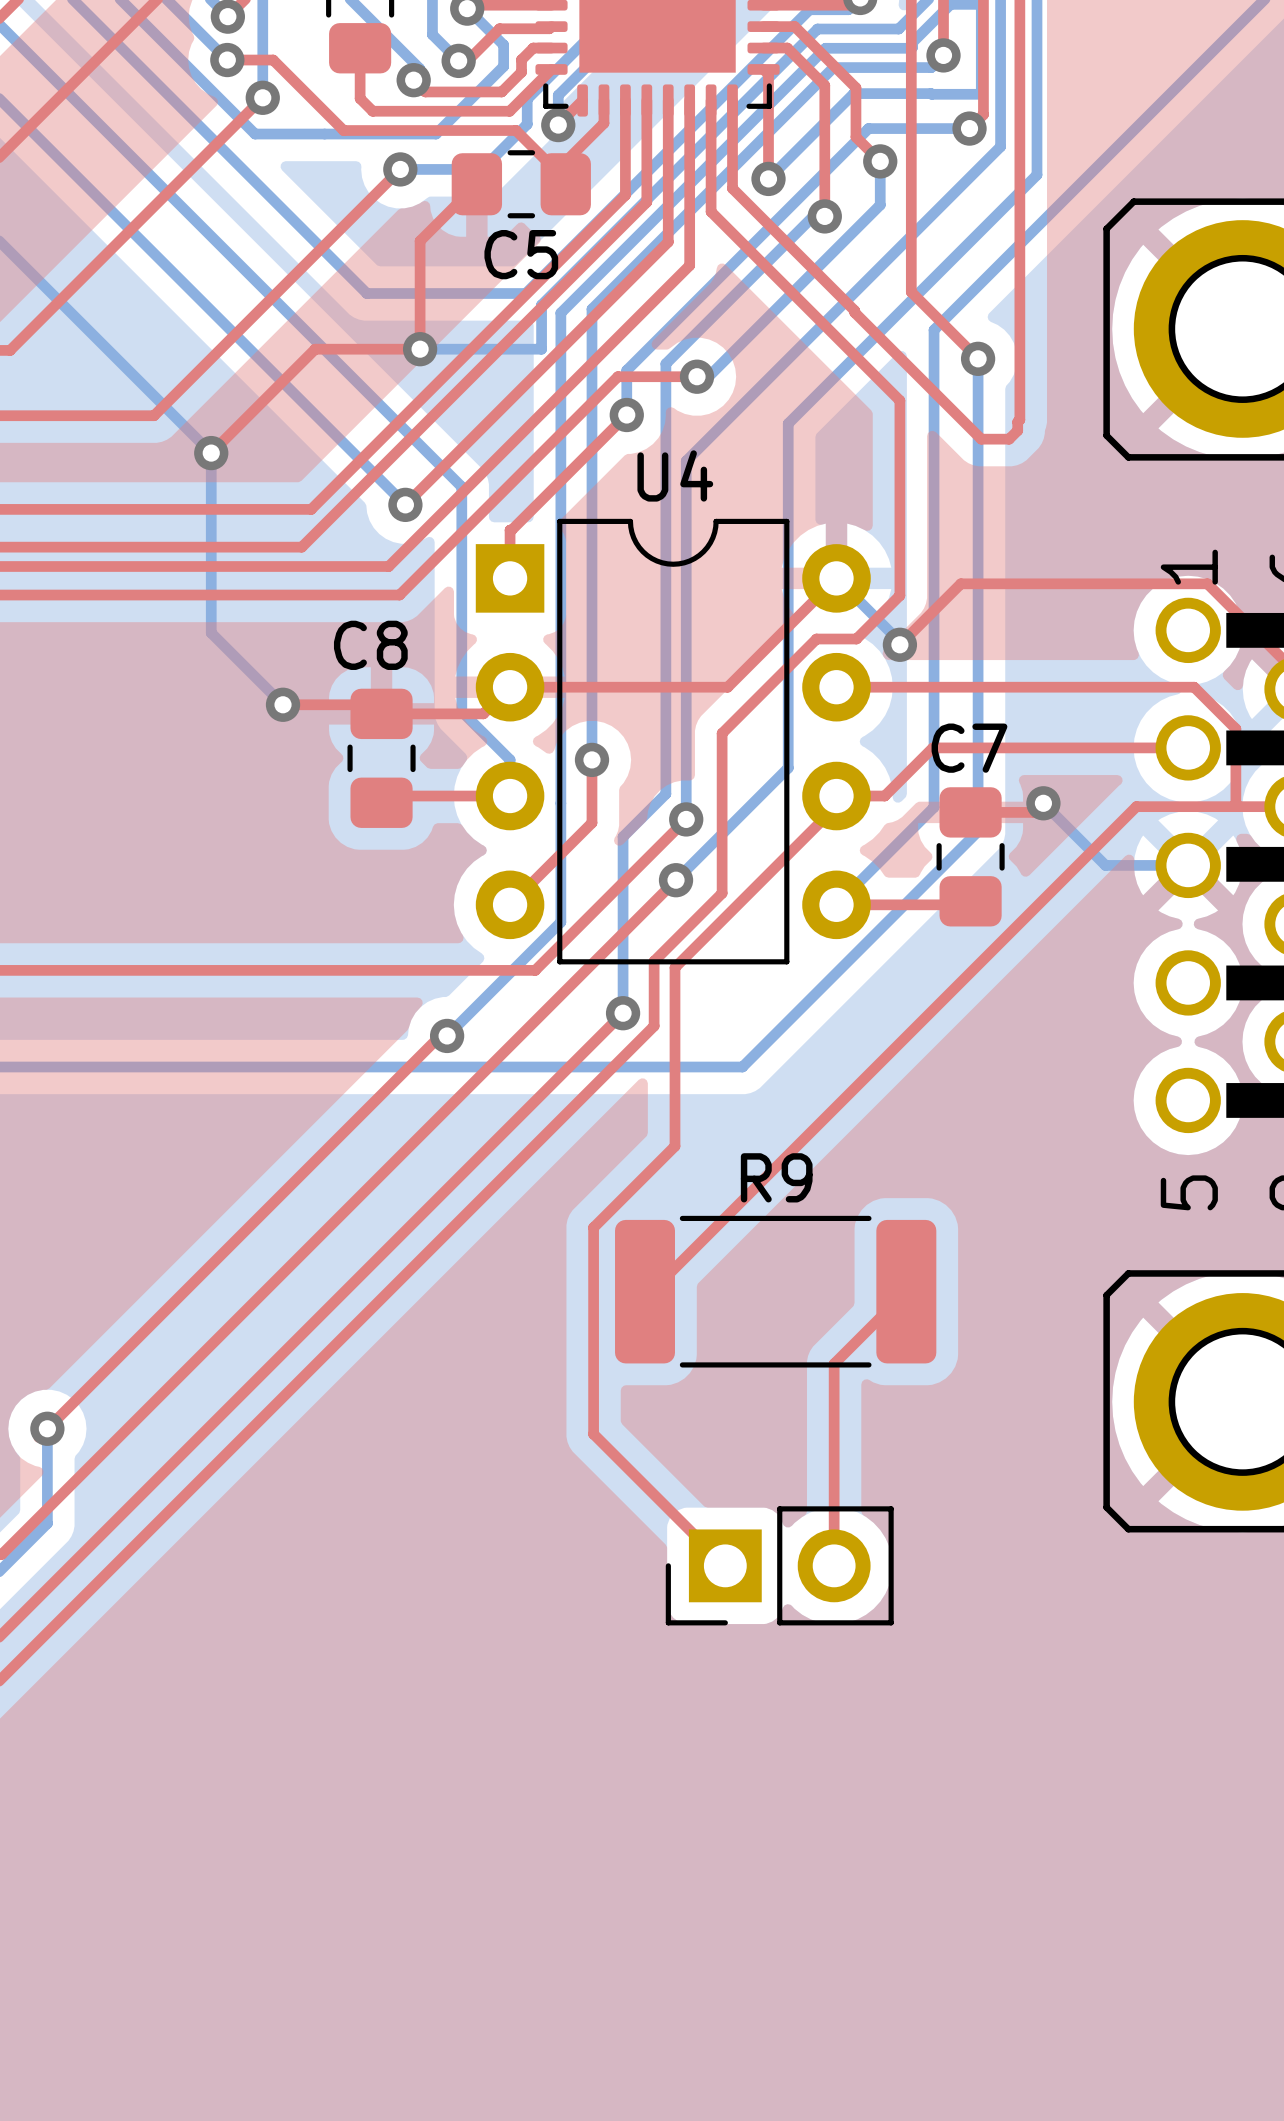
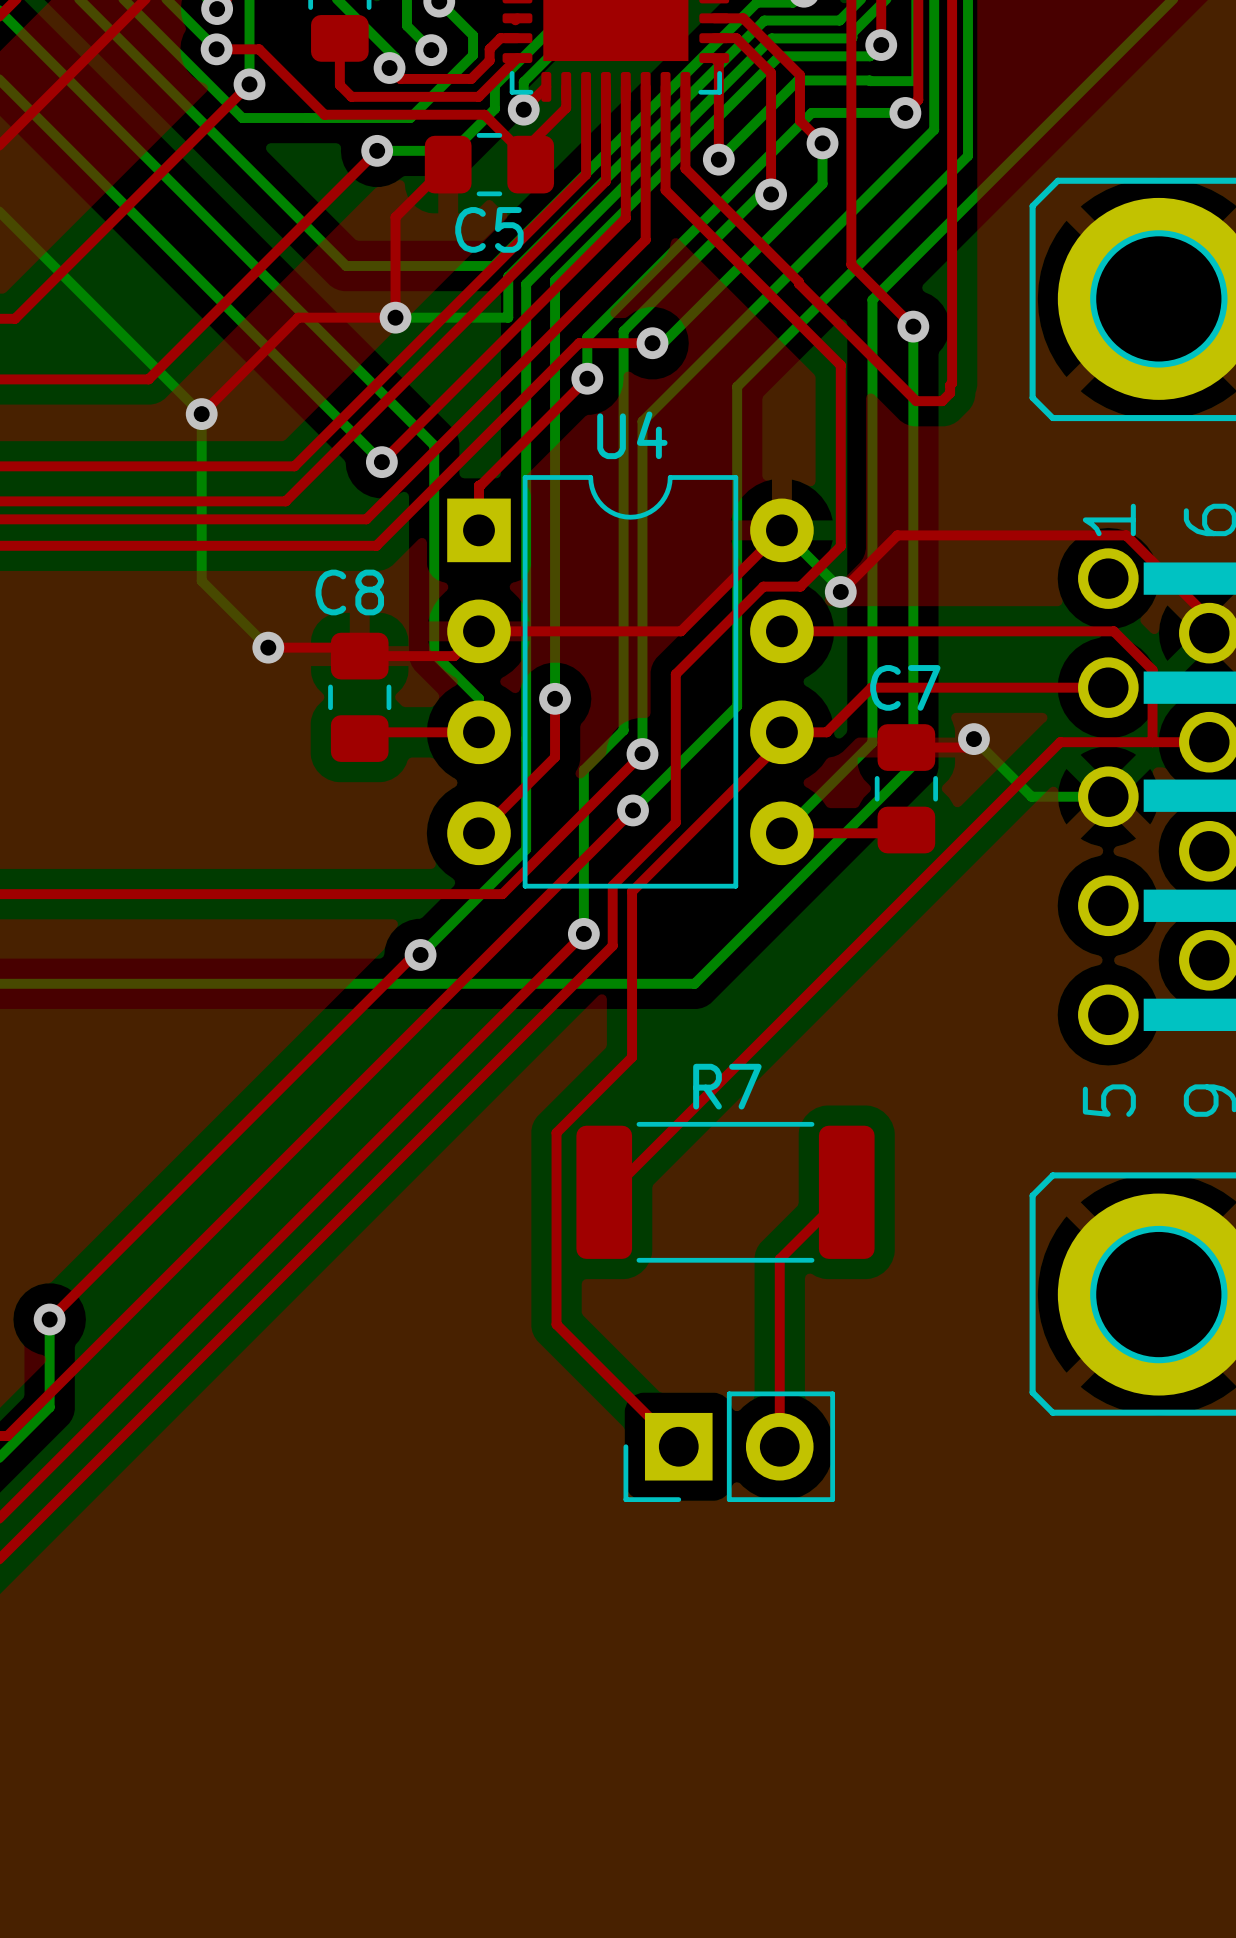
top track: (549, 28) (499, 28) (467, 60) (458, 60) -> none
R9 name: R9 (776, 1177) -> R7 (727, 1086)

